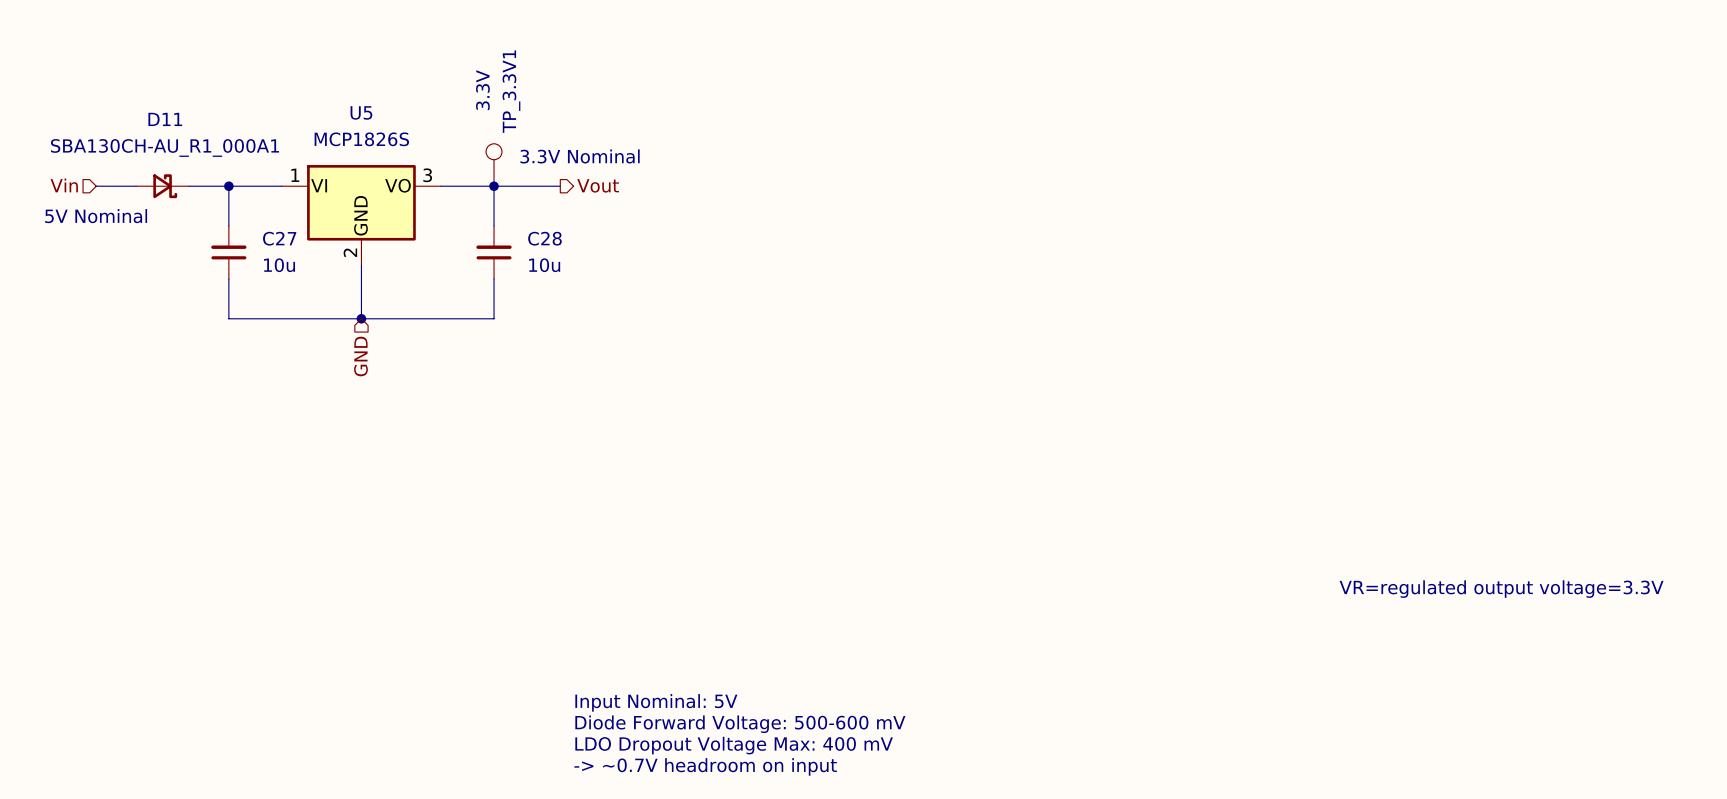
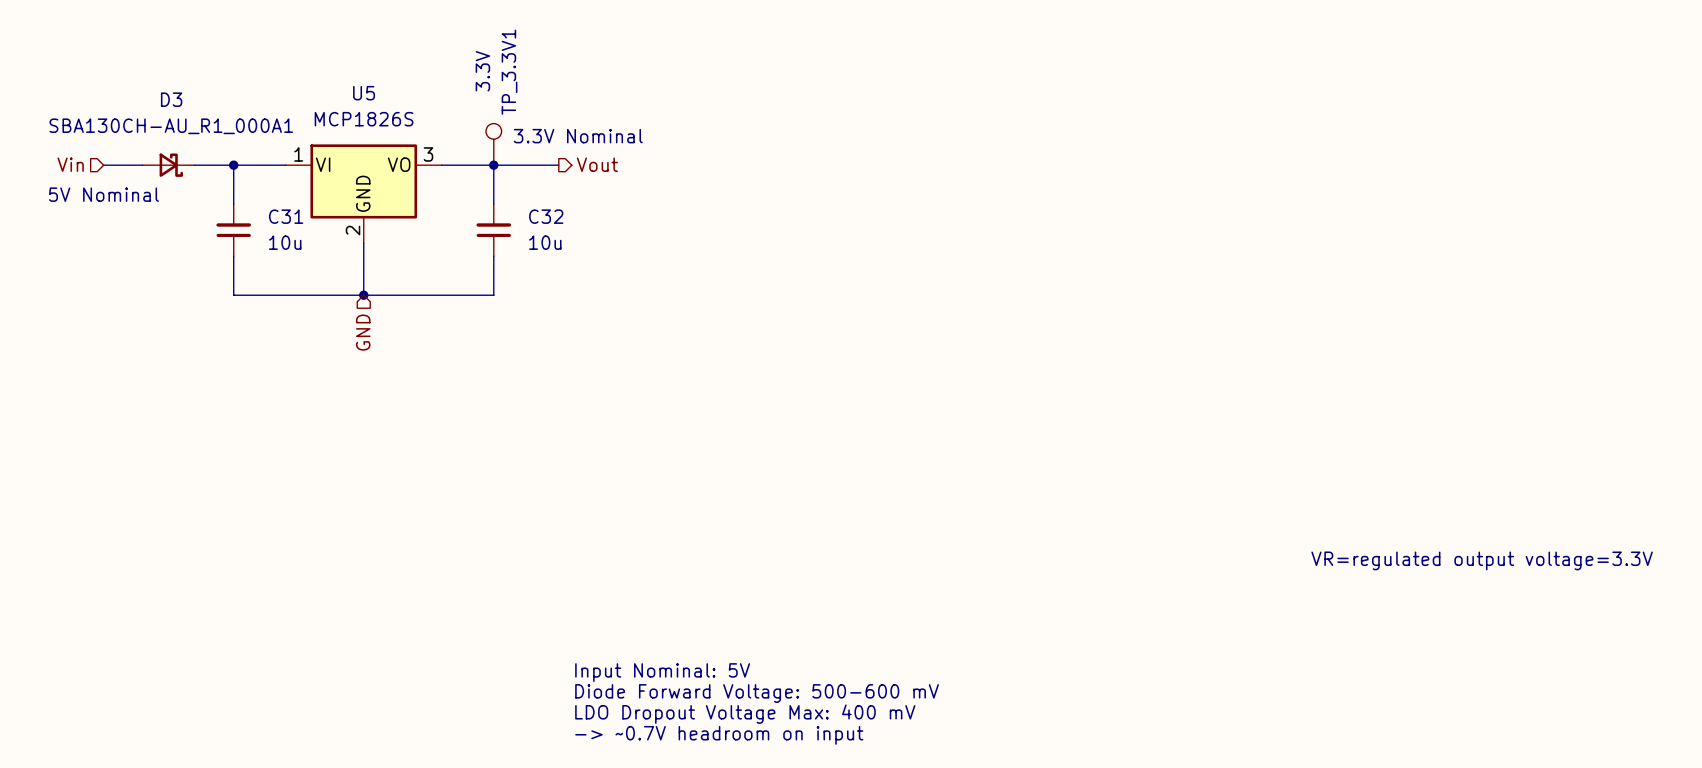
D11 name: D11 (165, 119) -> D3 (171, 99)
C27 name: C27 (279, 238) -> C31 (286, 216)
C28 name: C28 (544, 238) -> C32 (546, 216)

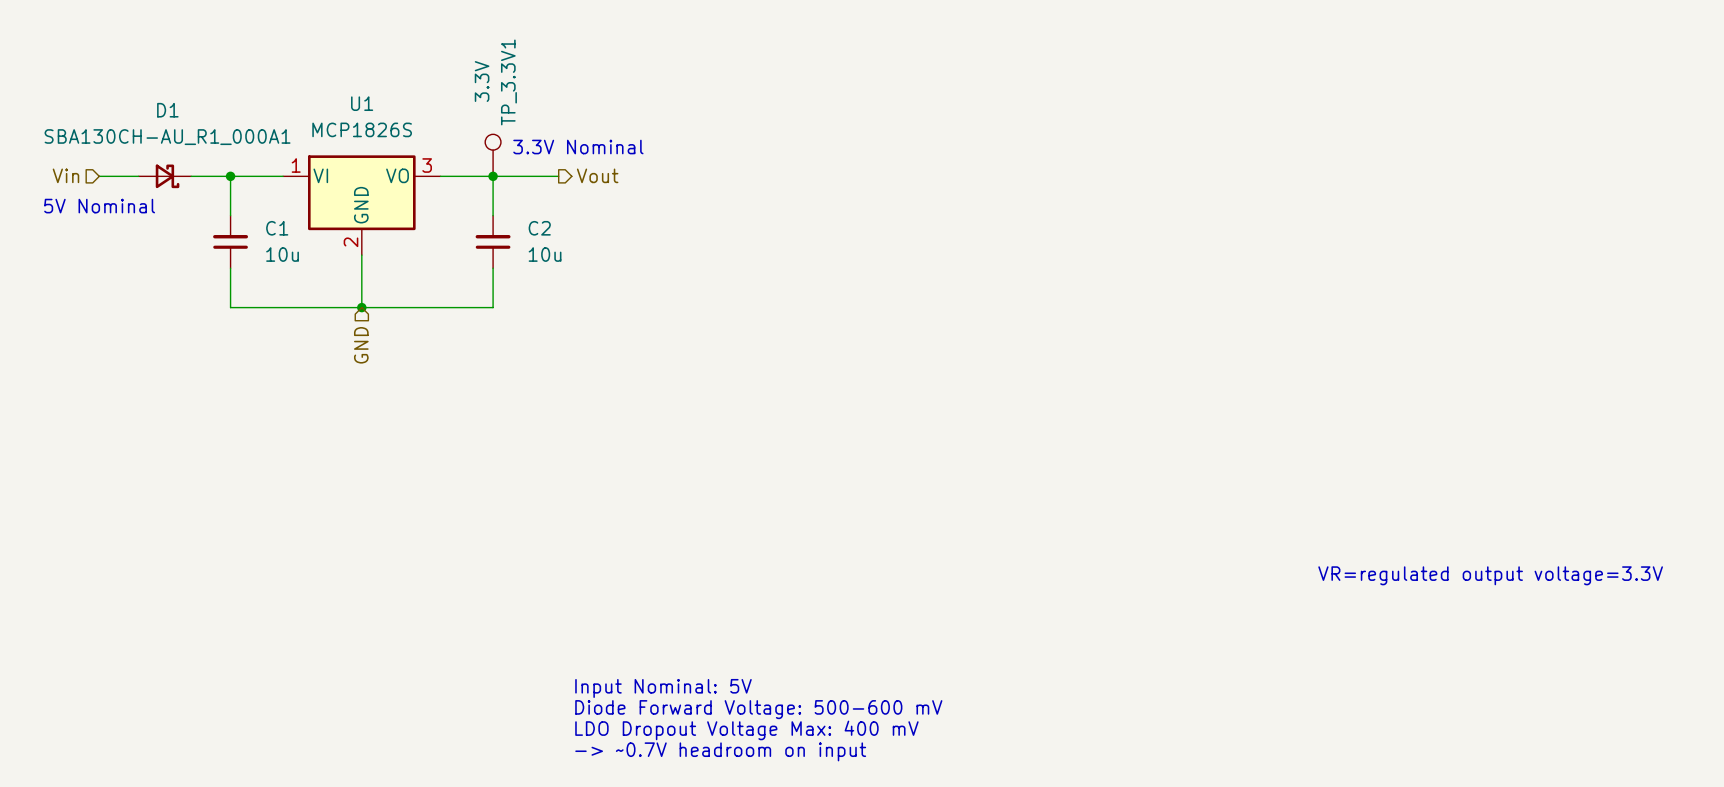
U5 name: U5 (364, 93) -> U1 (362, 103)
D3 name: D3 (171, 99) -> D1 (167, 110)
C31 name: C31 (286, 216) -> C1 (277, 228)
C32 name: C32 (546, 216) -> C2 (539, 228)

